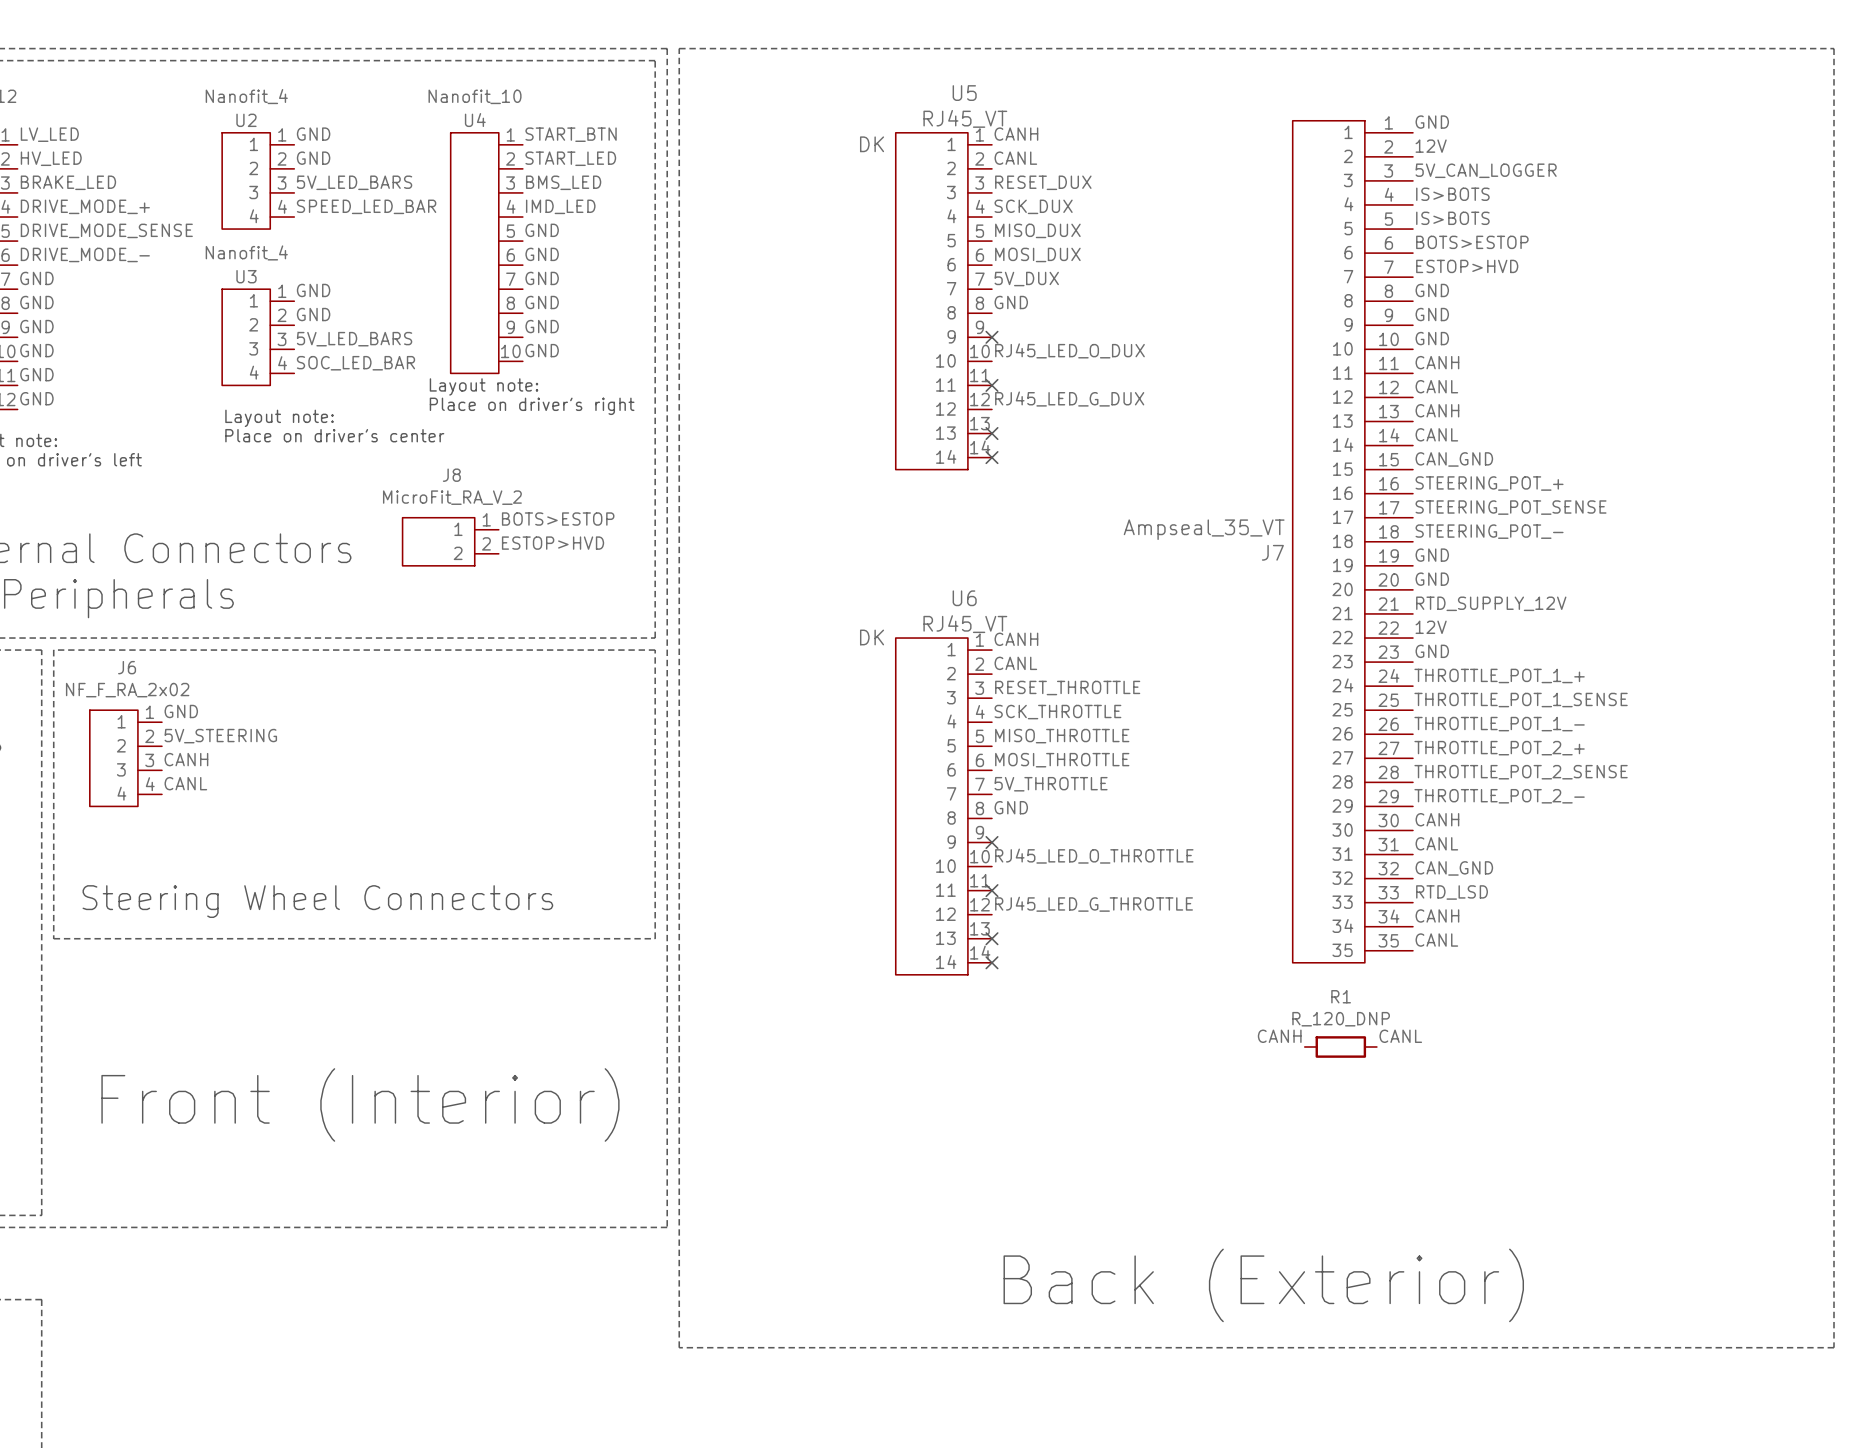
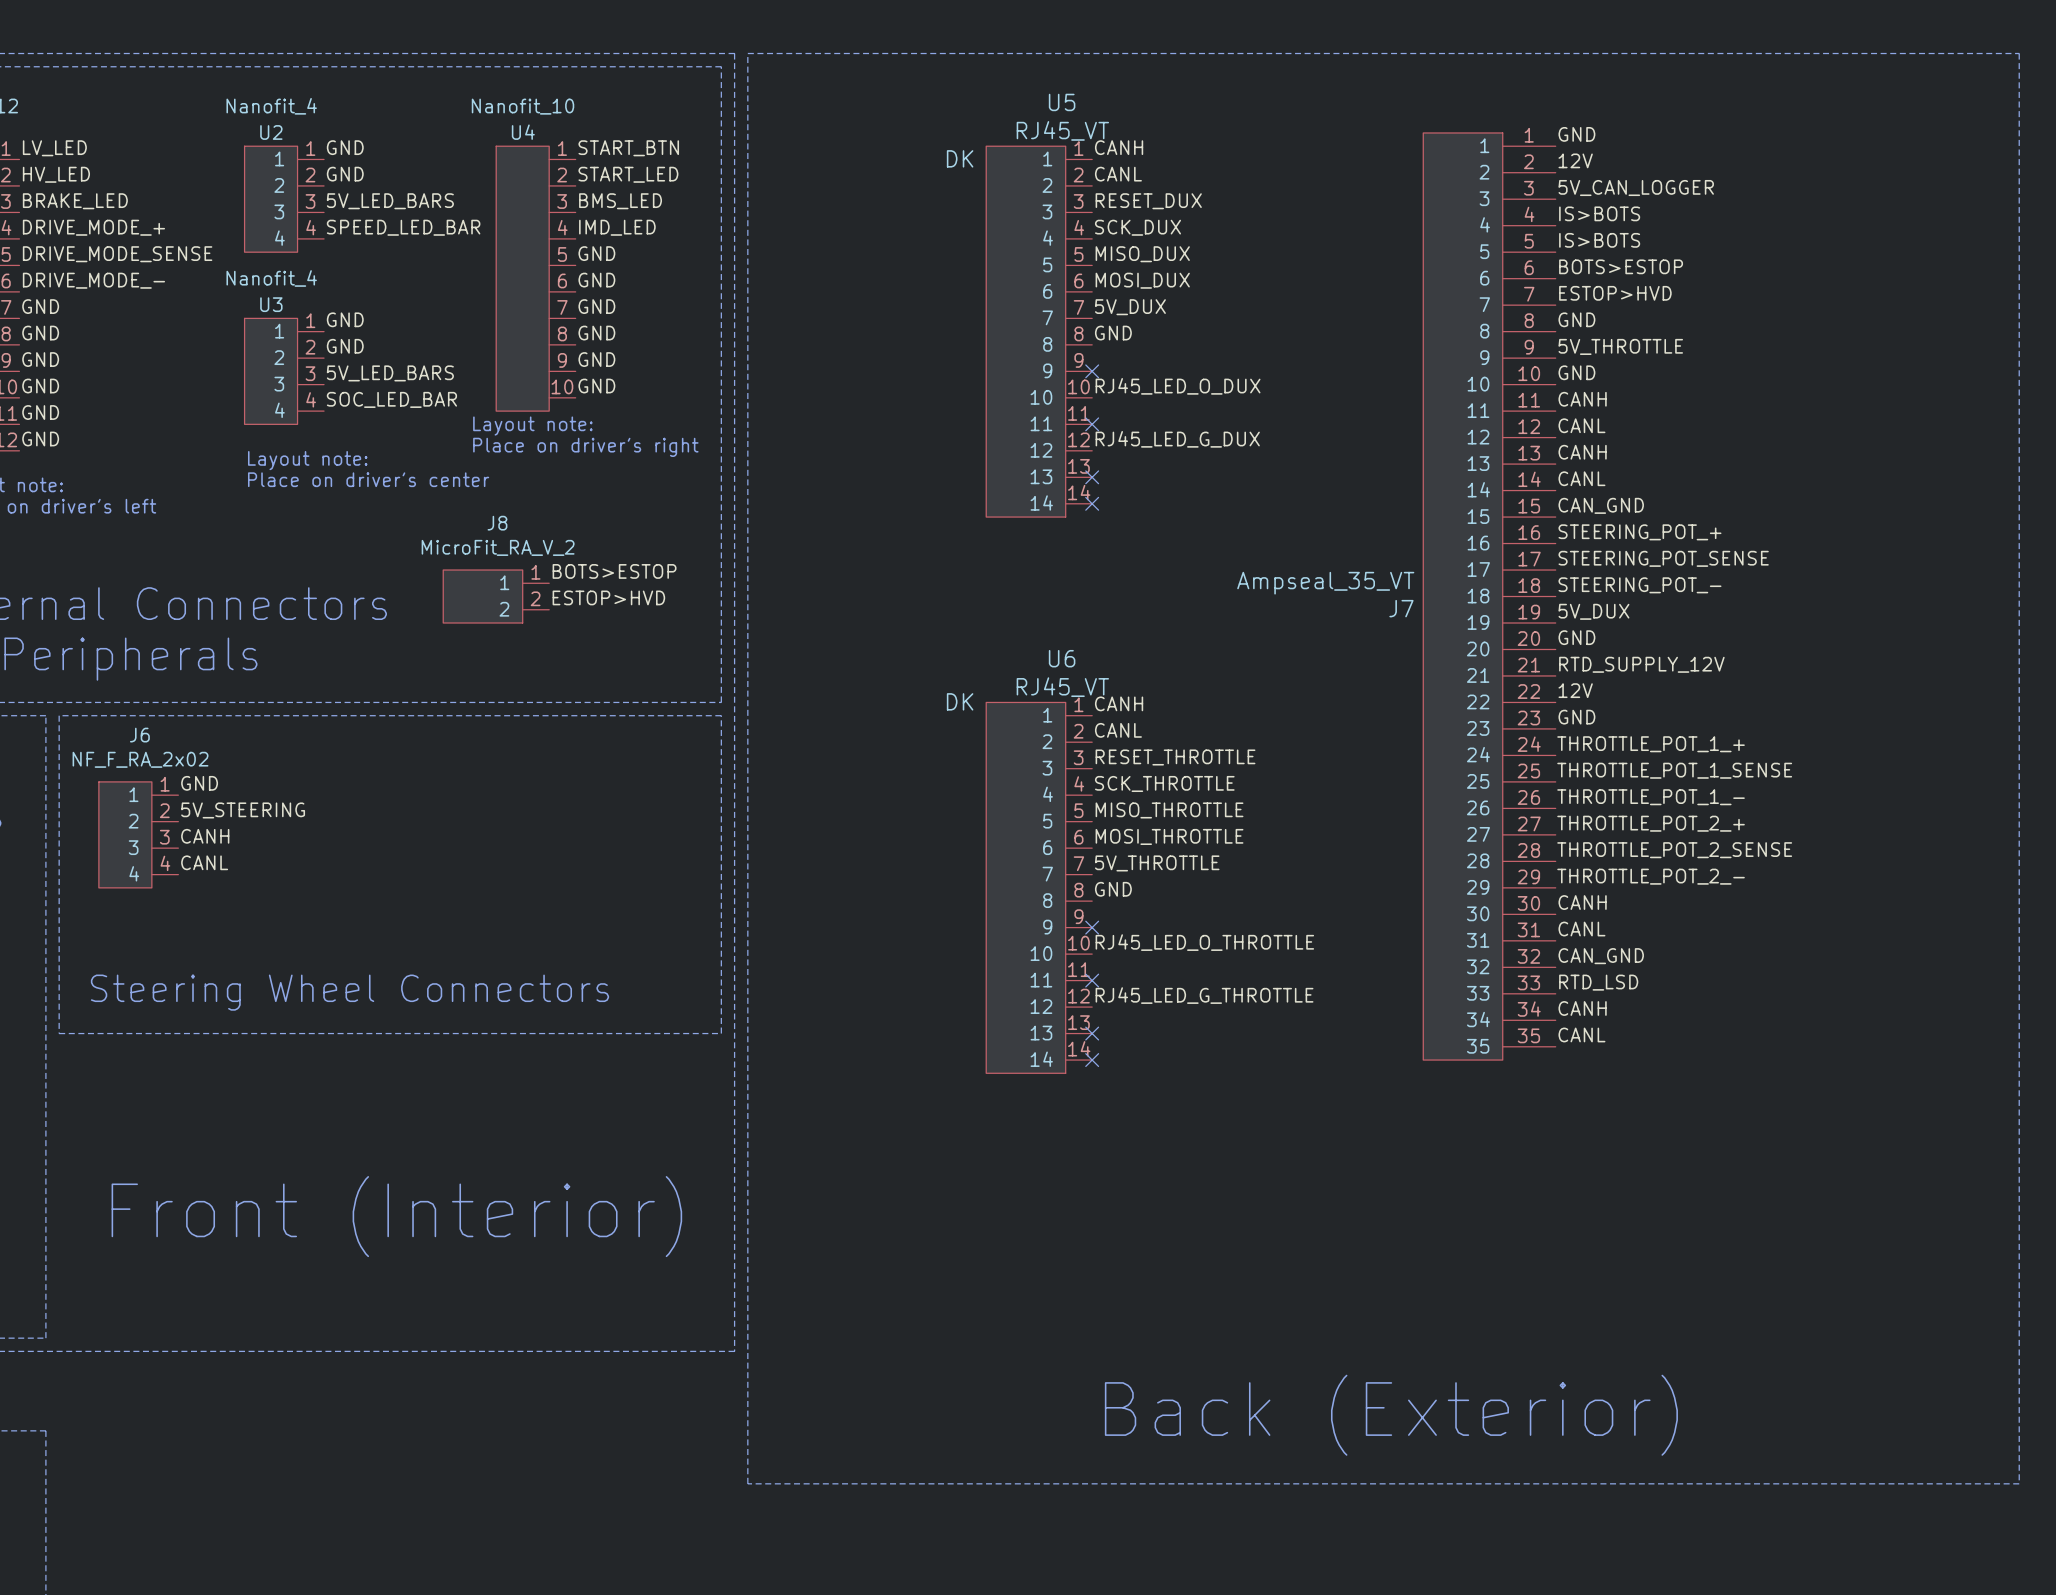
label: GND (1432, 314) -> 5V_THROTTLE (1620, 346)
label: GND (1432, 555) -> 5V_DUX (1593, 611)
label: CANH (1279, 1036) -> none
label: CANL (1400, 1036) -> none
R1: R_120_DNP (1340, 1047) -> none

